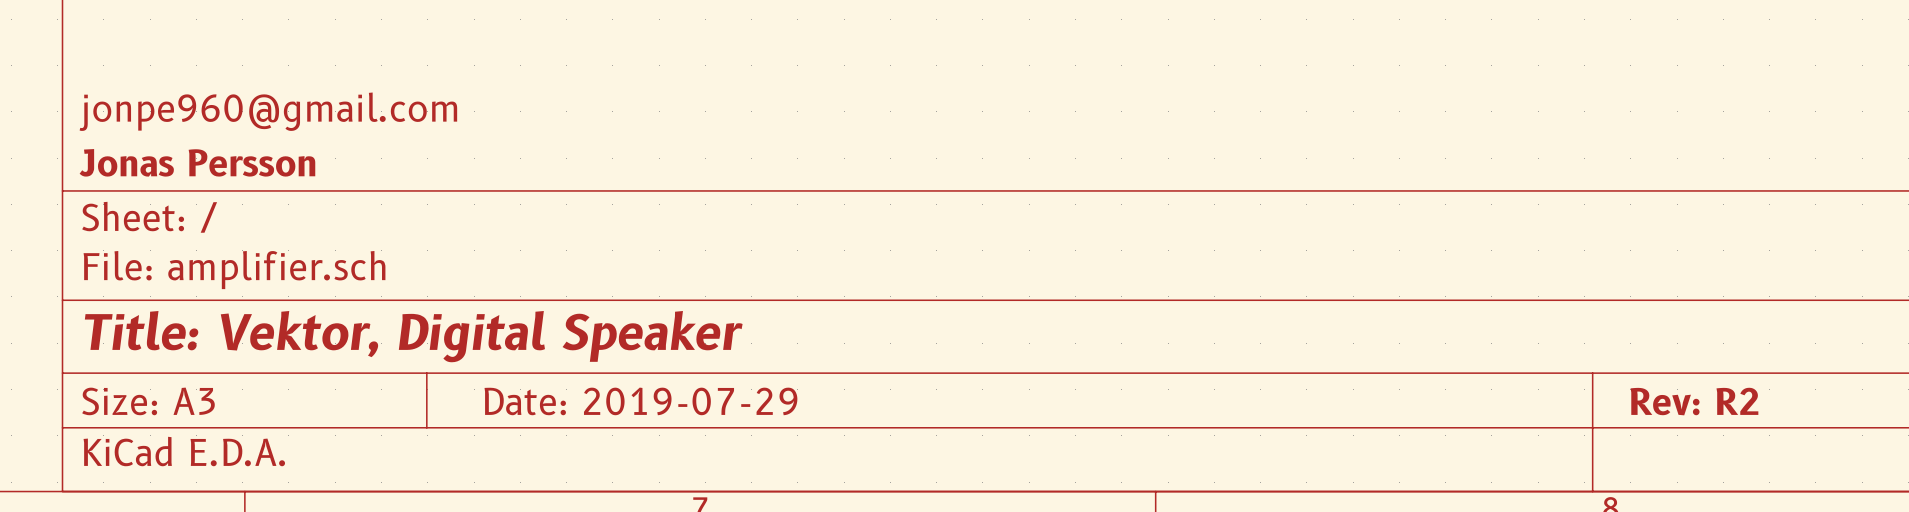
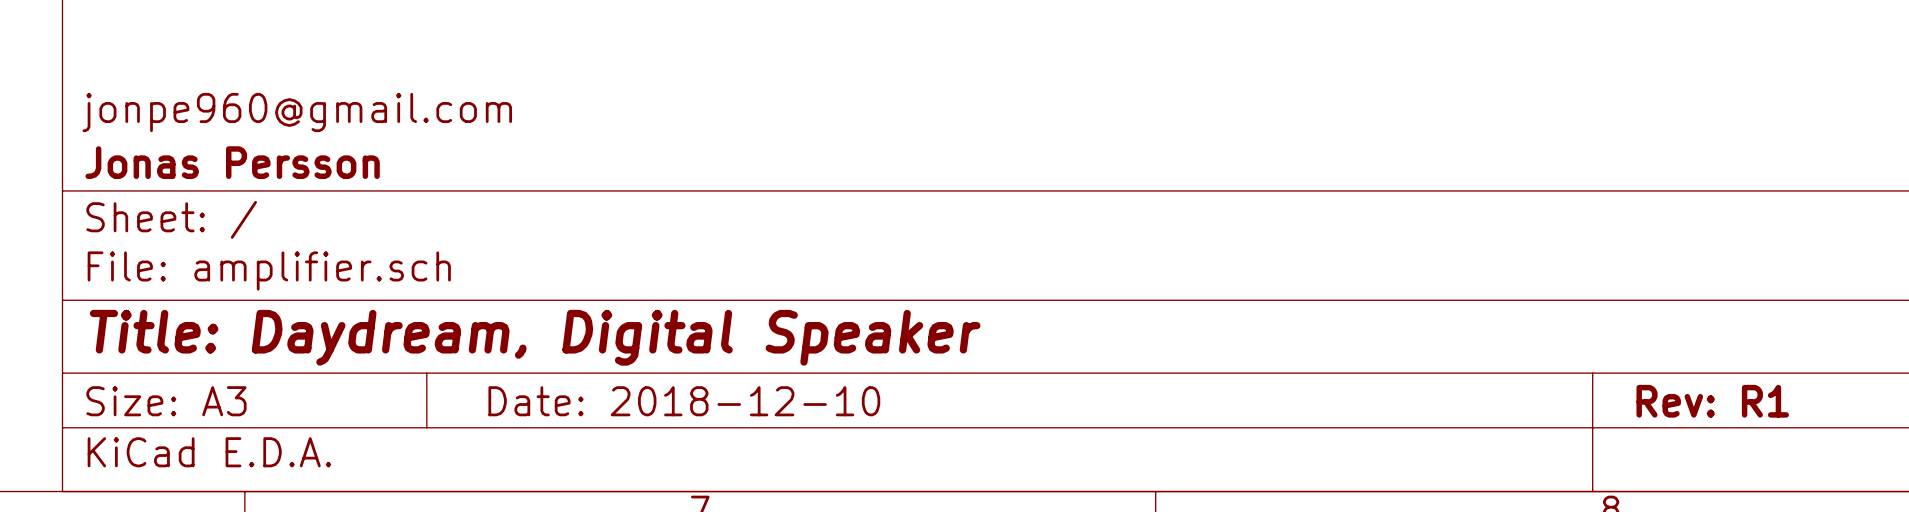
title block: Title: Vektor, Digital Speaker (413, 336) -> Title: Daydream, Digital Speaker (535, 337)
title block: Date: 2019-07-29 (640, 401) -> Date: 2018-12-10 (684, 401)
title block: Rev: R2 (1694, 401) -> Rev: R1 (1712, 401)

